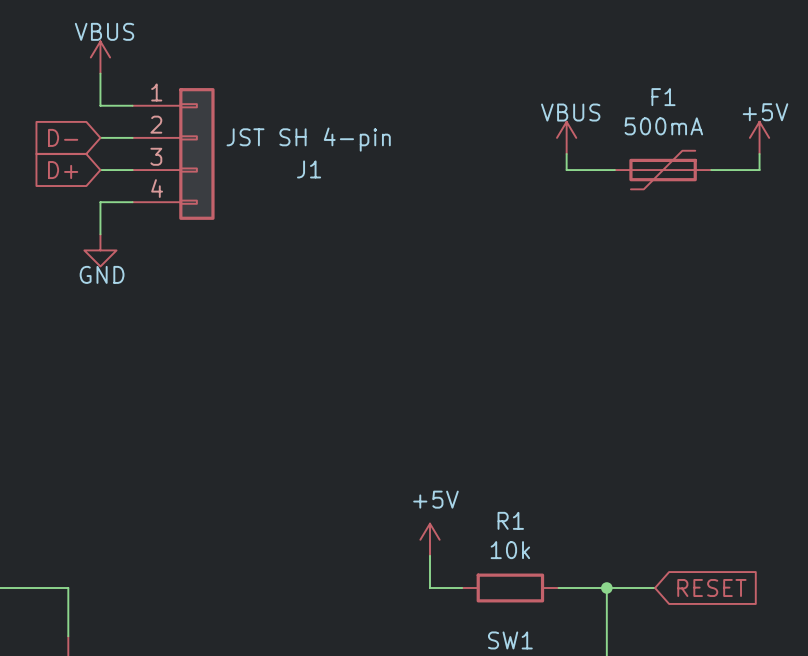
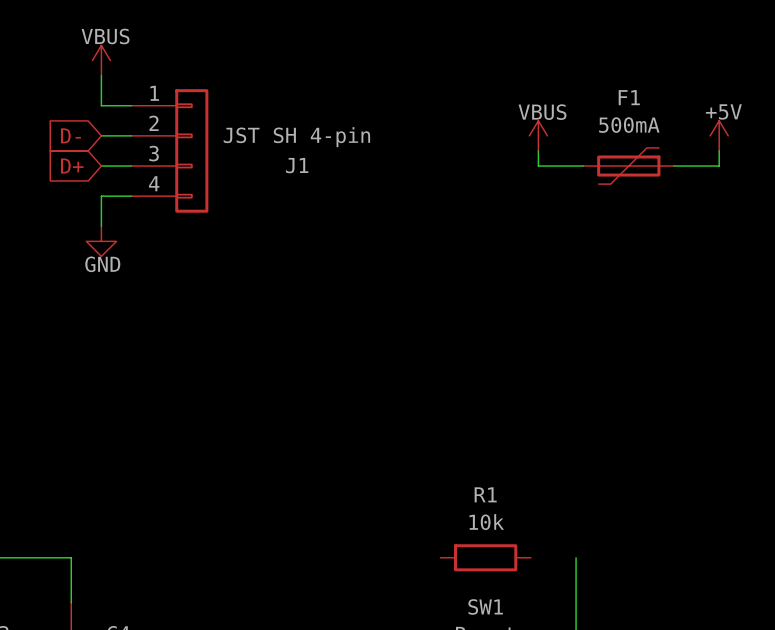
power symbol: +5V (430, 539) -> none
wire: (430, 555) (430, 588) (462, 588) -> none
wire: (558, 588) (655, 588) -> none
junction: (606, 588) -> none
global label: RESET (711, 588) -> none

